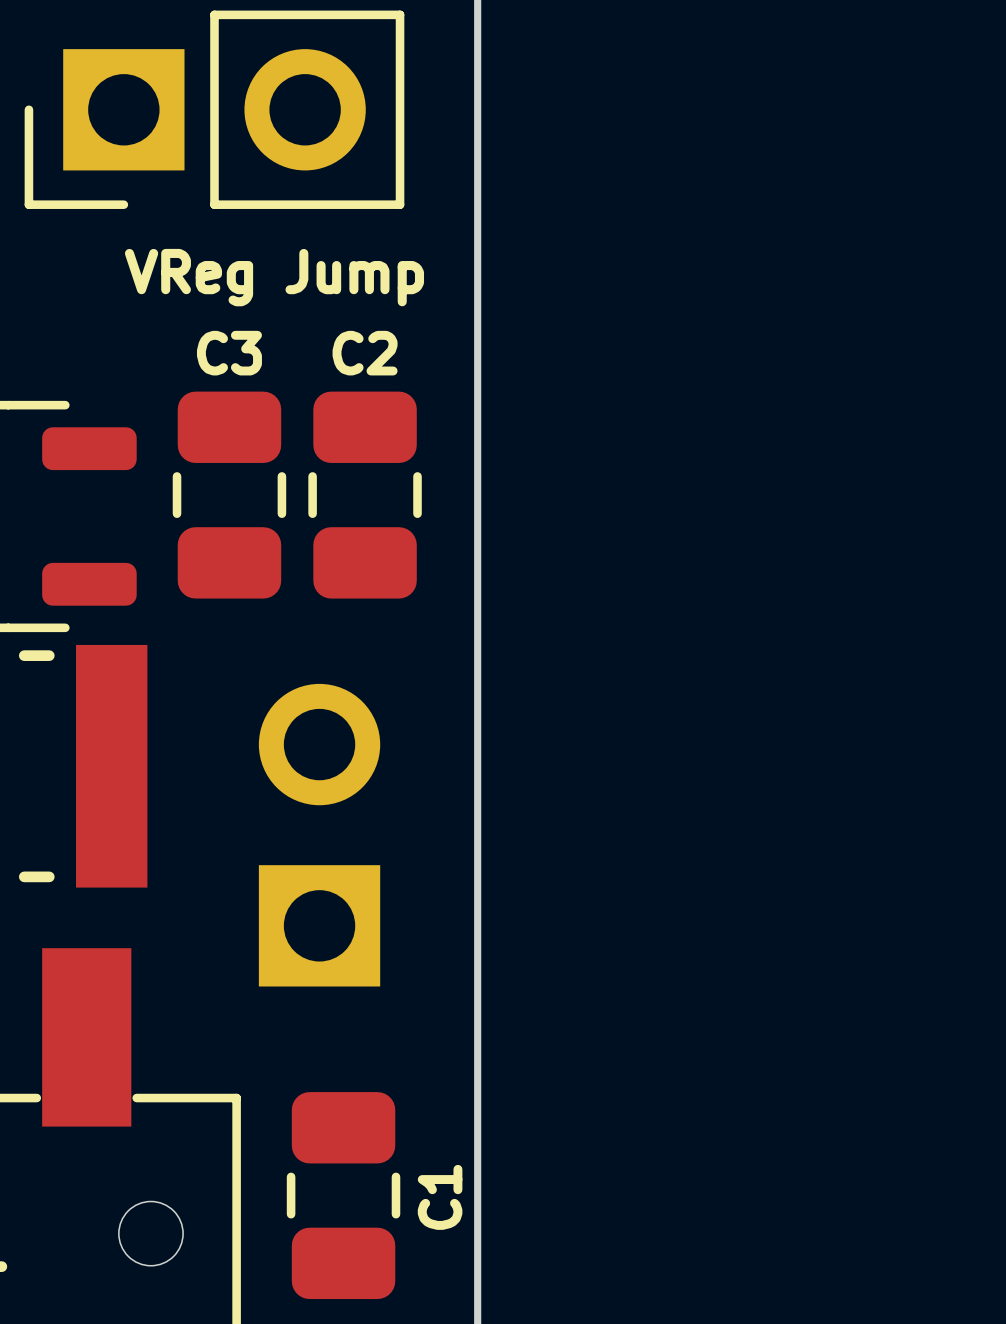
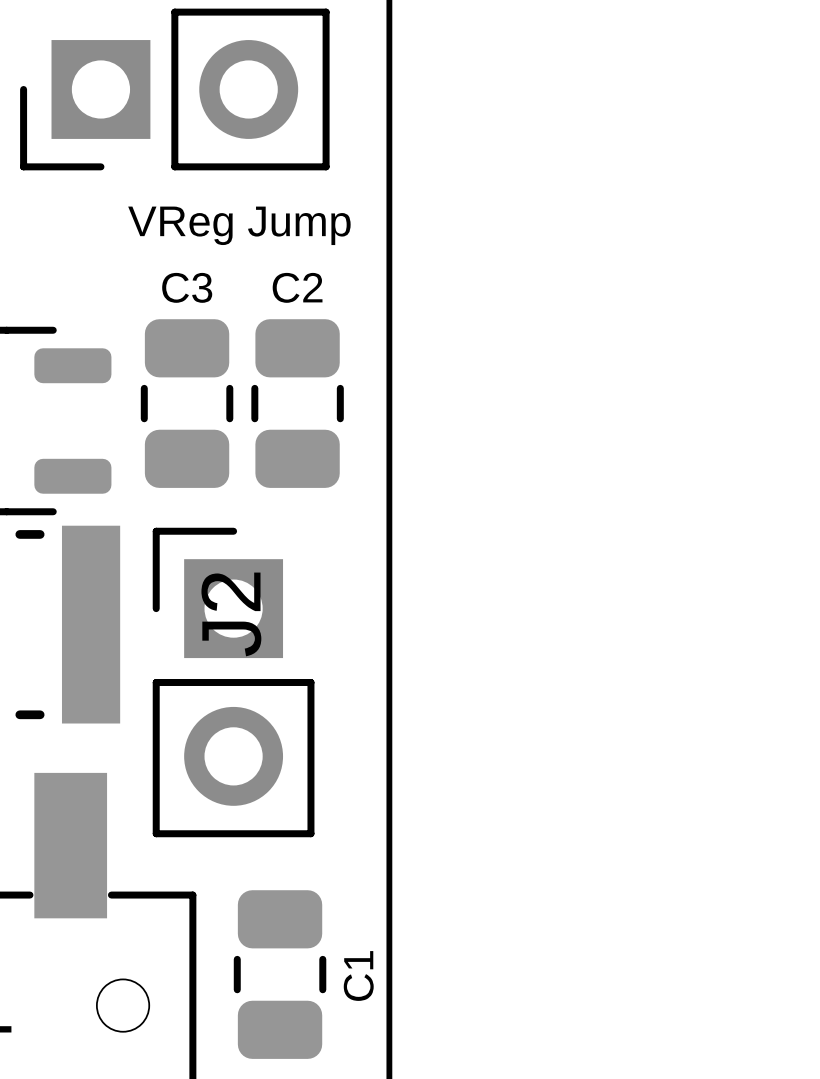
part: (319, 835) -> none
J2: none -> (233, 682)

